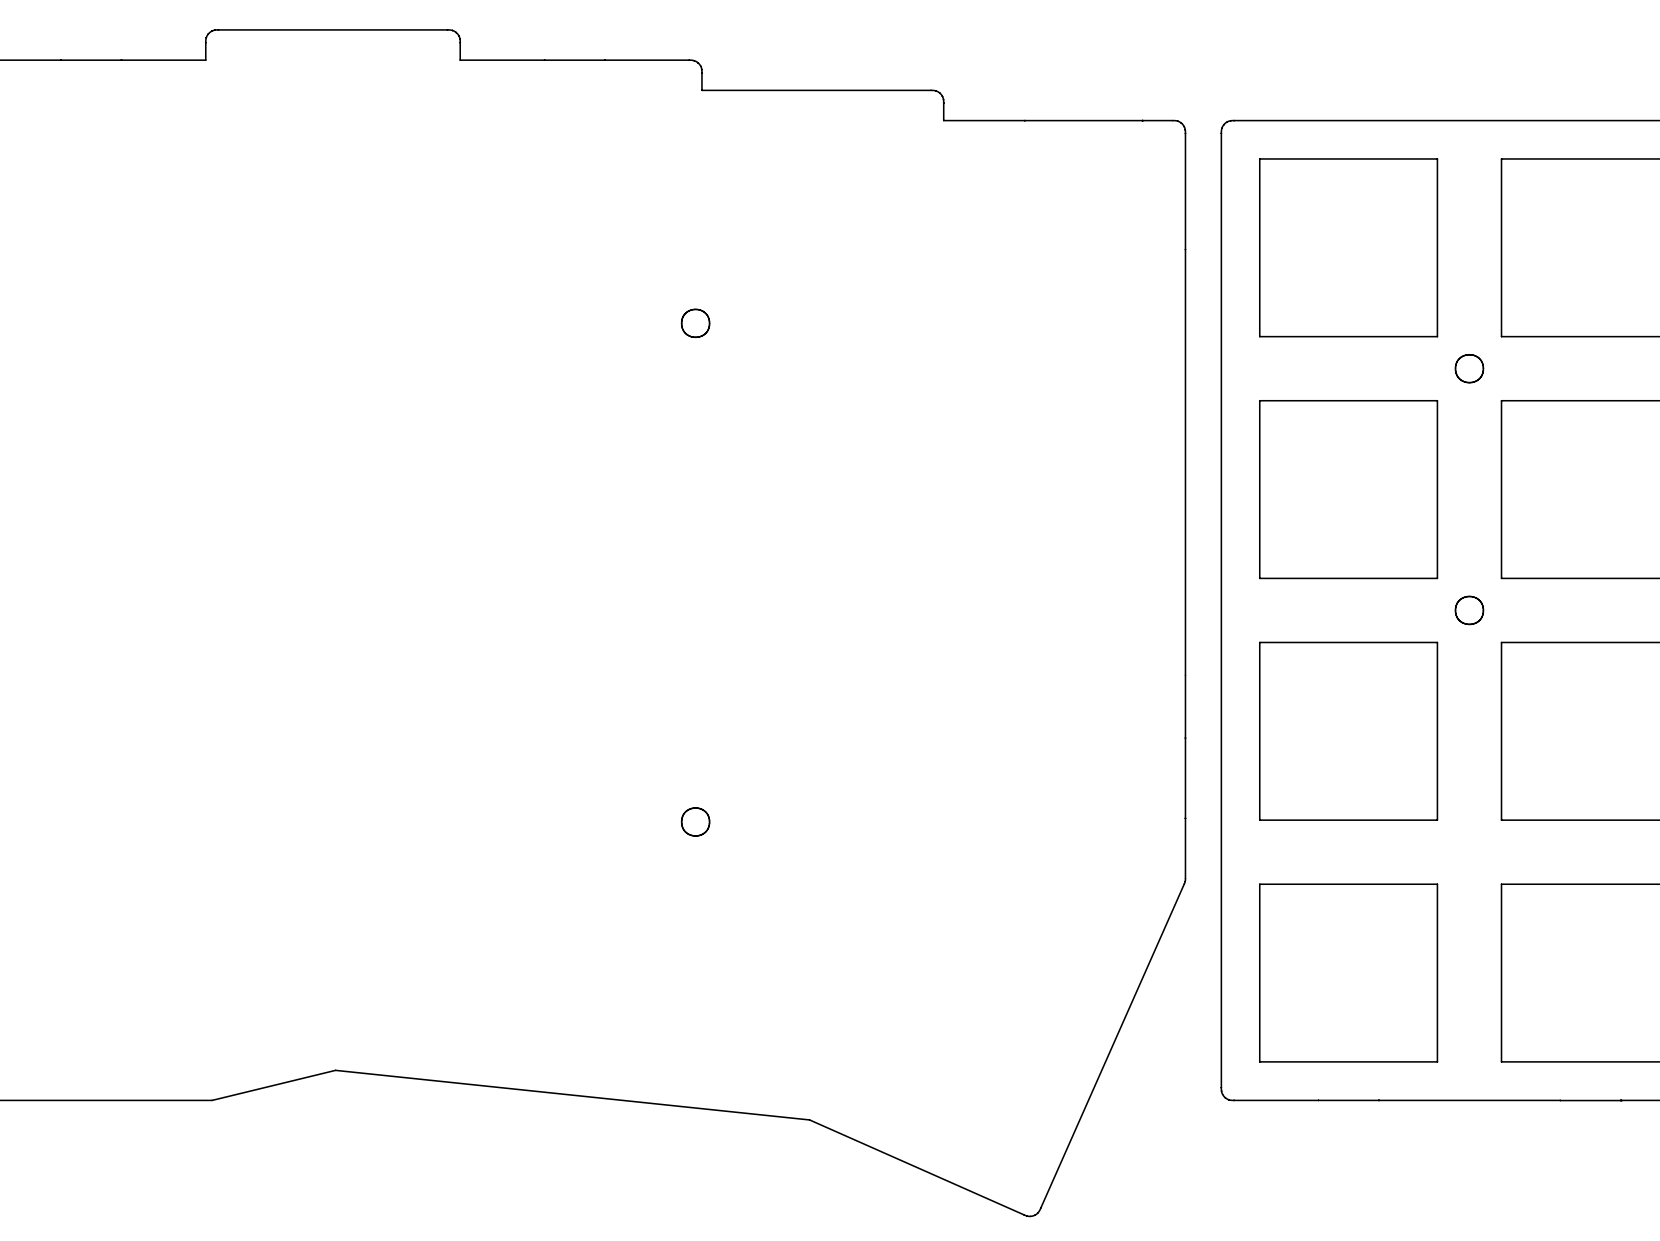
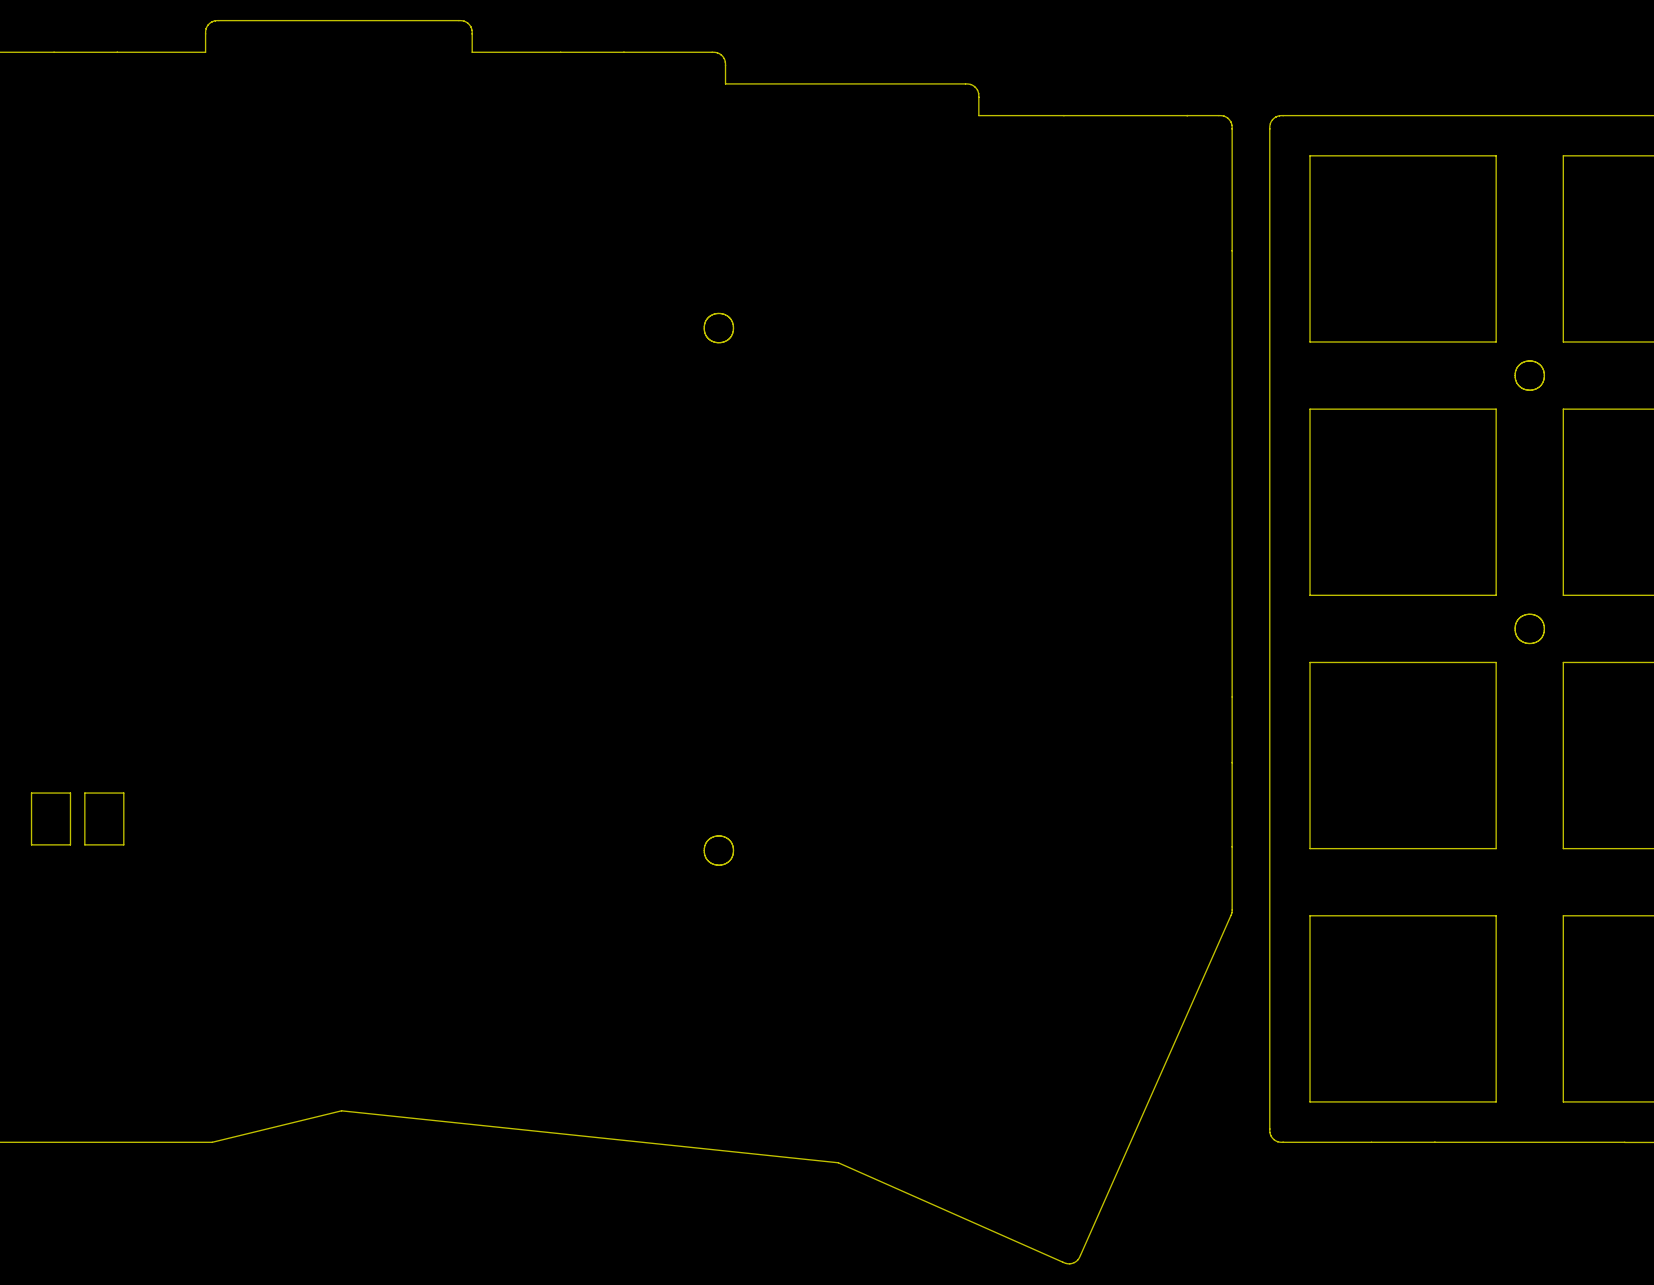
board edge: none -> (31, 793) (70, 793) (70, 844) (31, 844) (31, 793)
board edge: none -> (84, 793) (123, 793) (123, 844) (84, 844) (84, 793)

